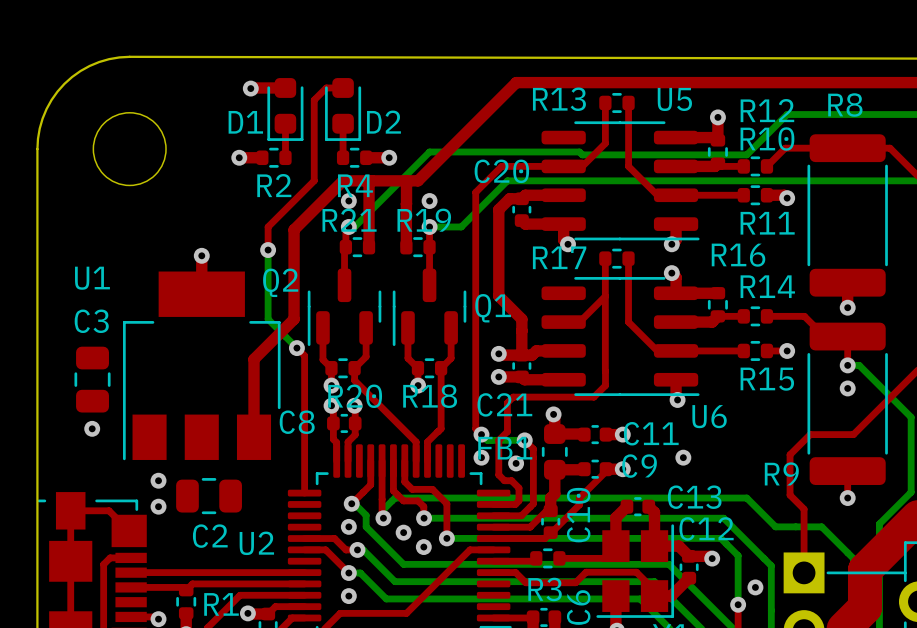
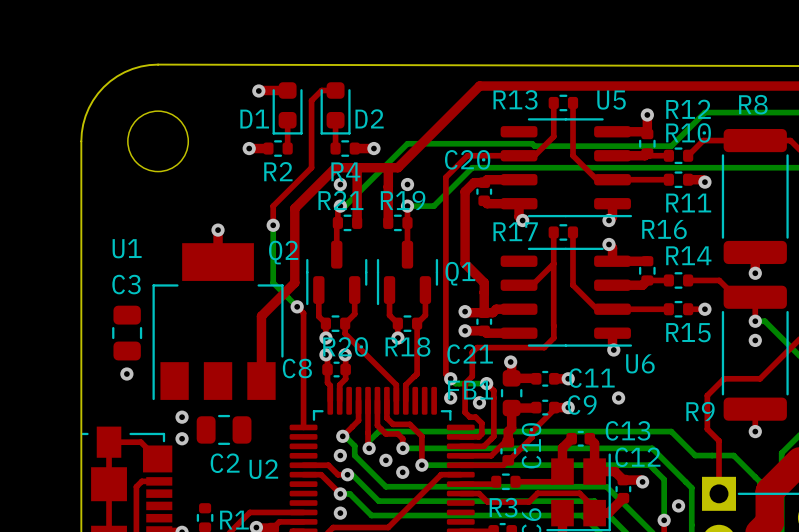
top track: (131, 572) (304, 572) -> none
top track: (304, 583) (192, 583) (186, 590) (183, 587) (131, 587) -> none

